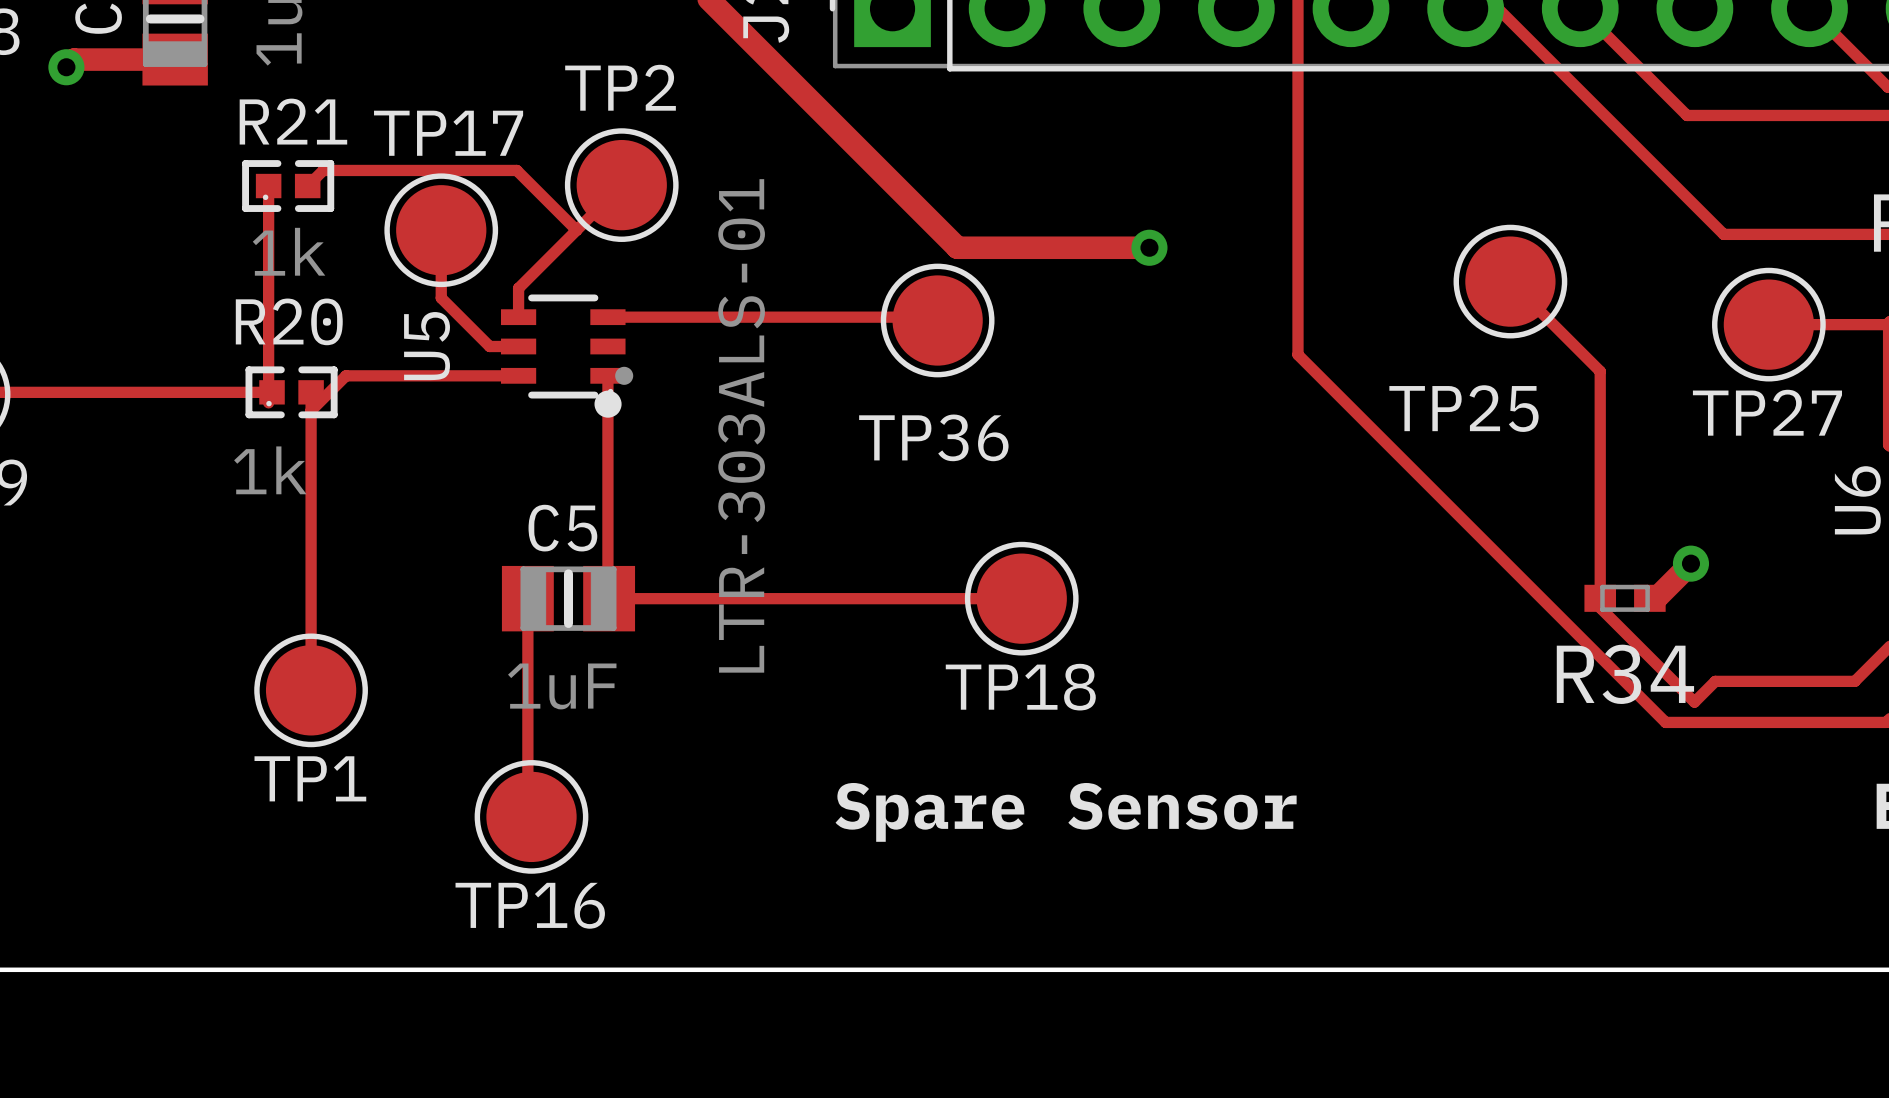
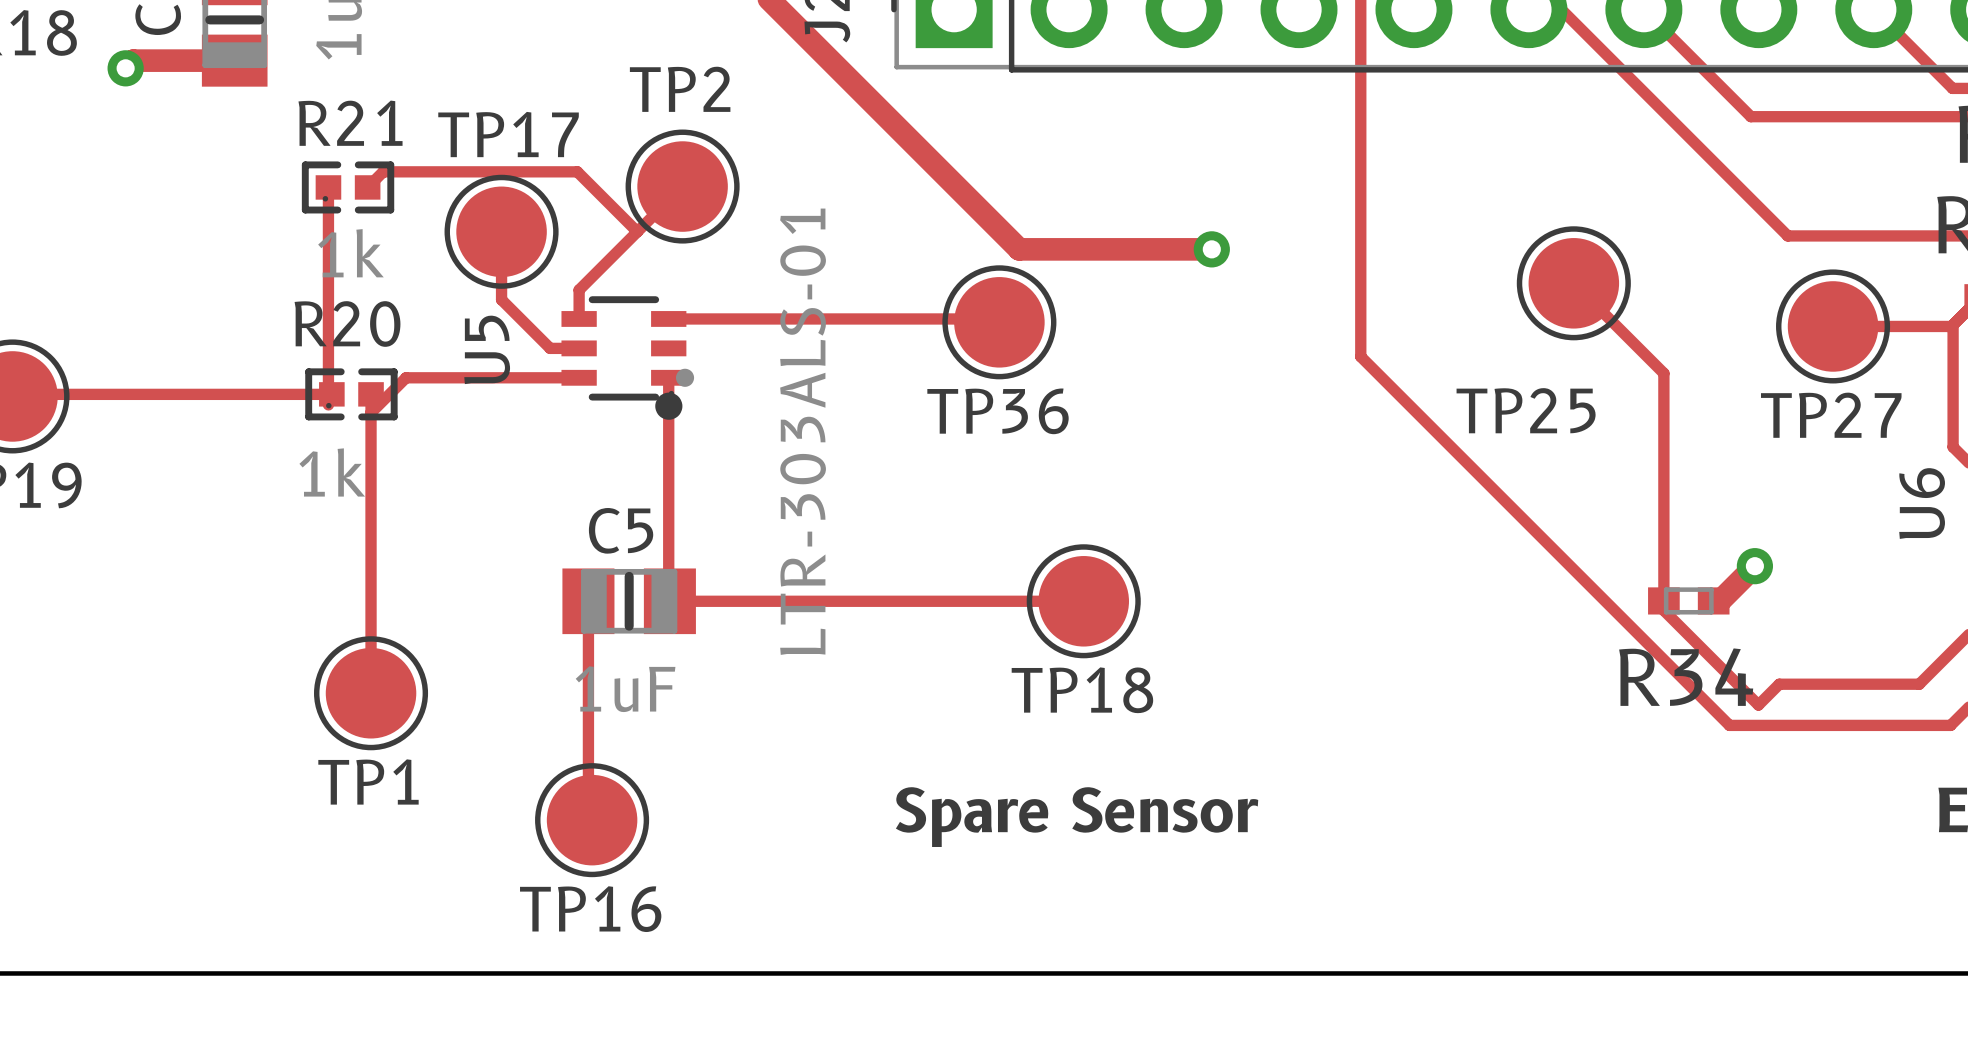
TP36 name position: TP36 (933, 437) -> TP36 (998, 411)

